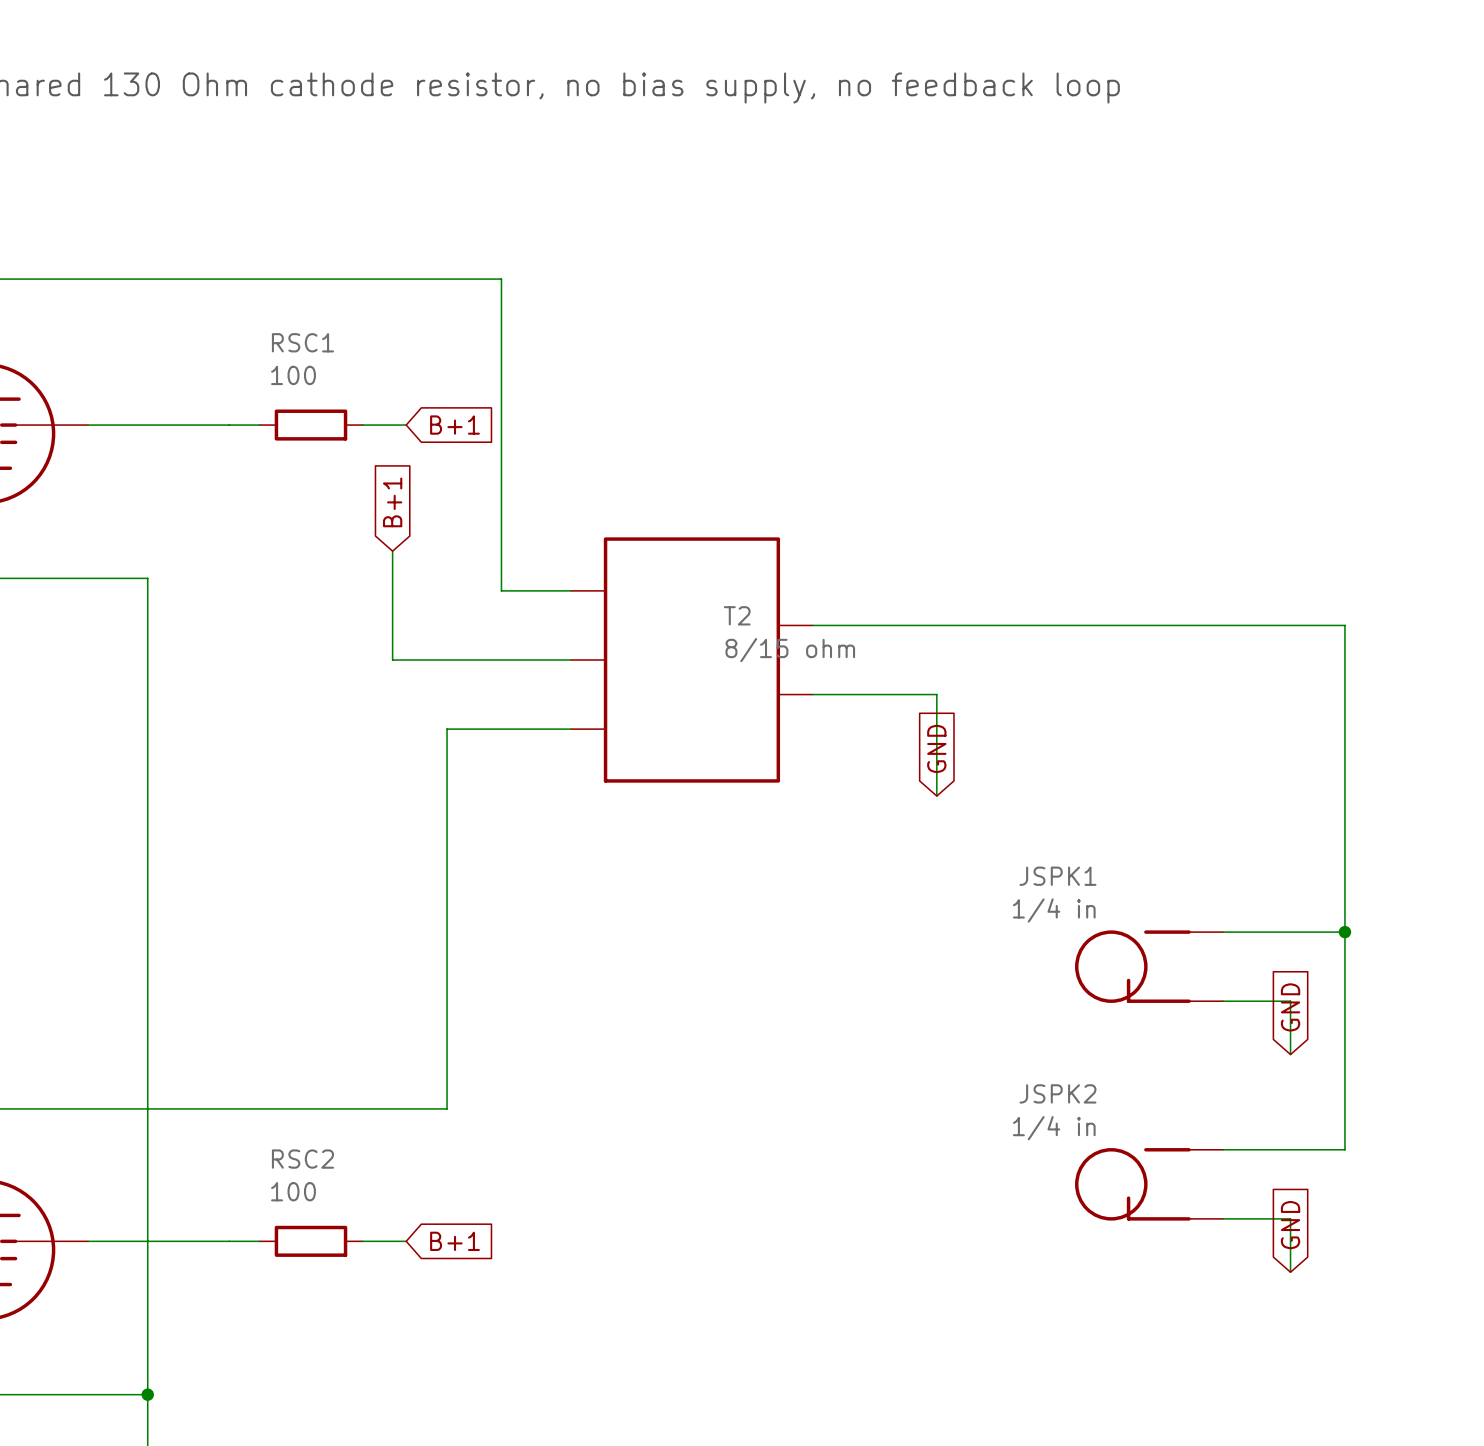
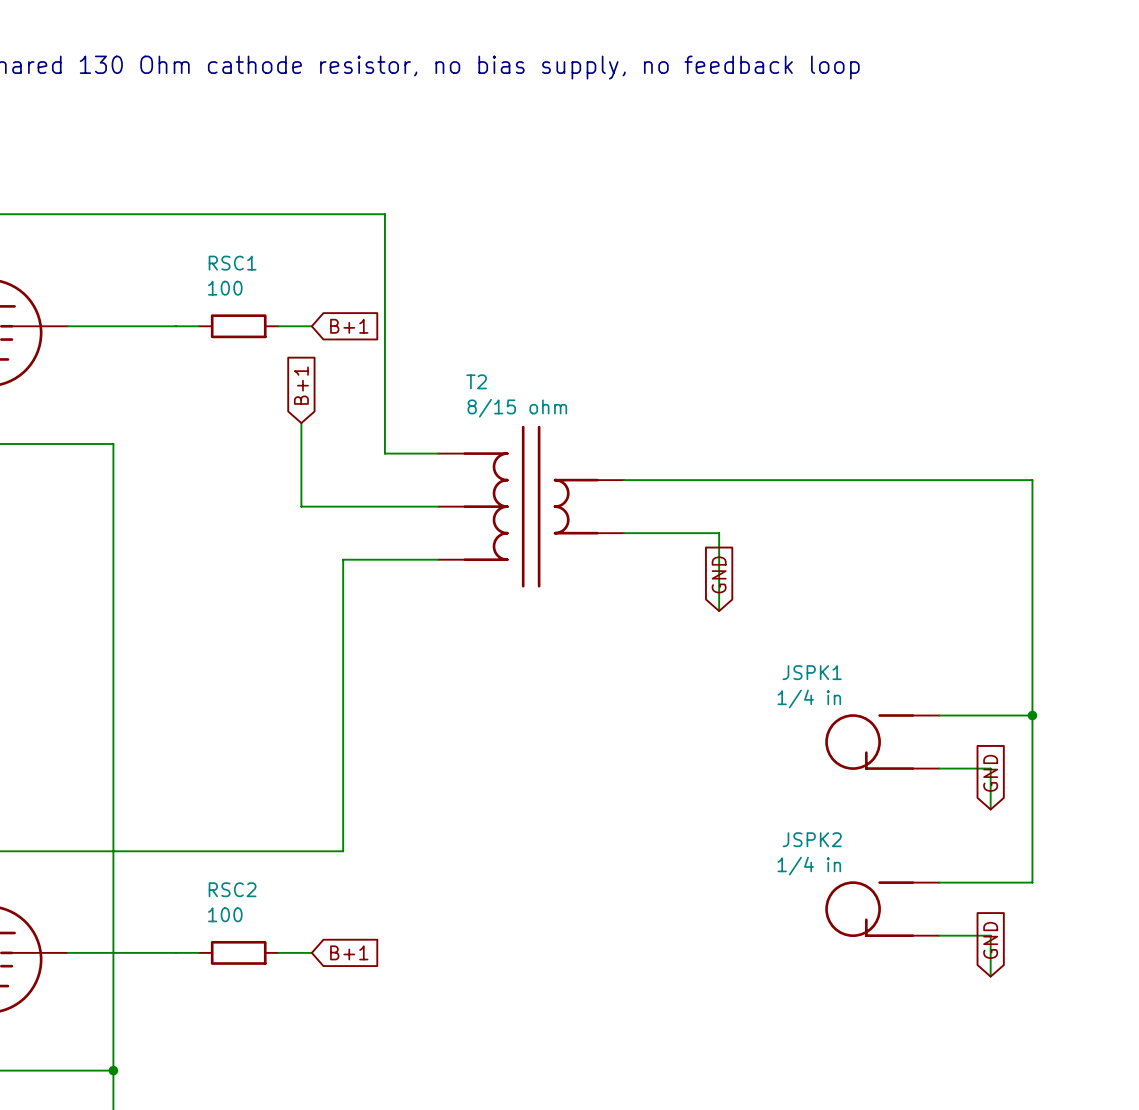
T2 symbol: [570, 537, 813, 783] -> [438, 425, 624, 588]
T2 name position: T2 (737, 615) -> T2 (476, 381)
T2 value position: 8/15 ohm (790, 650) -> 8/15 ohm (517, 408)

